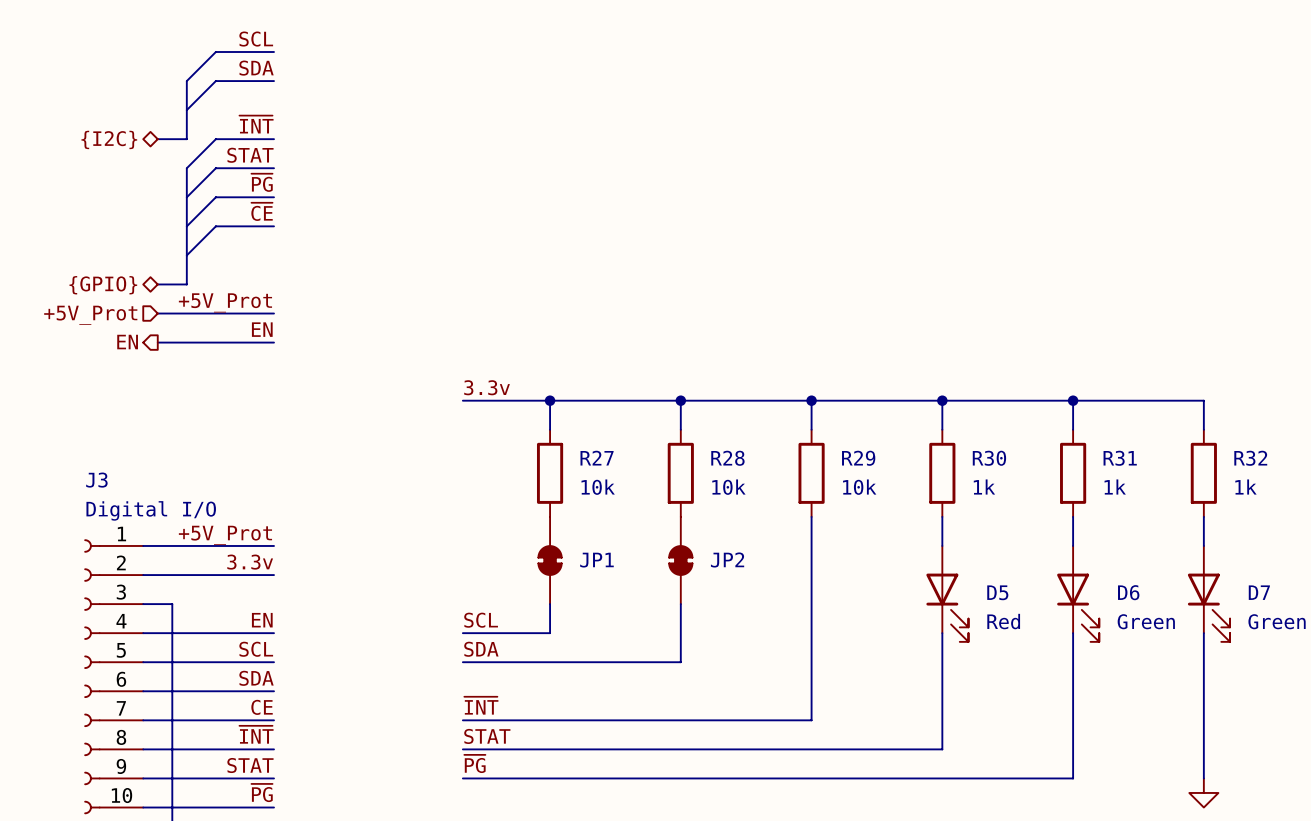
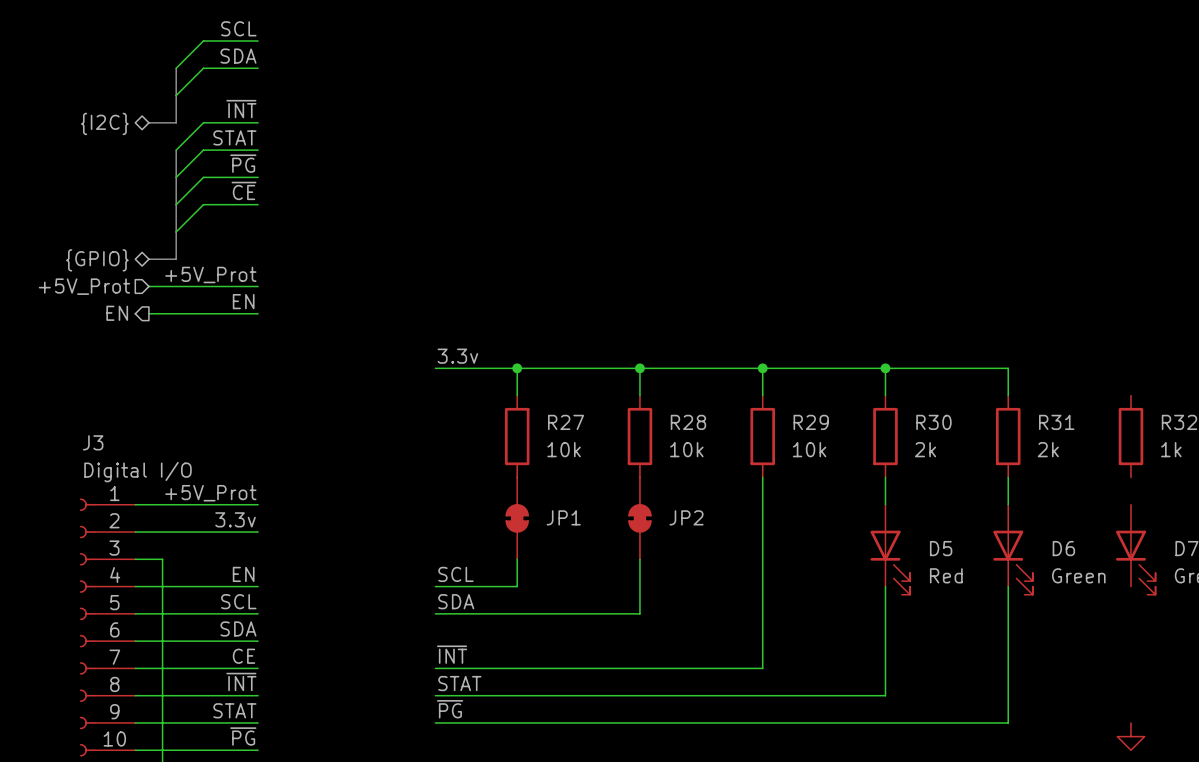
wire: (1073, 400) (1203, 400) (1203, 429) -> none
junction: (1073, 400) -> none
R30 value: 1k (984, 487) -> 2k (925, 449)
R31 value: 1k (1115, 487) -> 2k (1048, 449)
wire: (1203, 516) (1203, 545) -> none
wire: (1203, 633) (1203, 778) -> none

